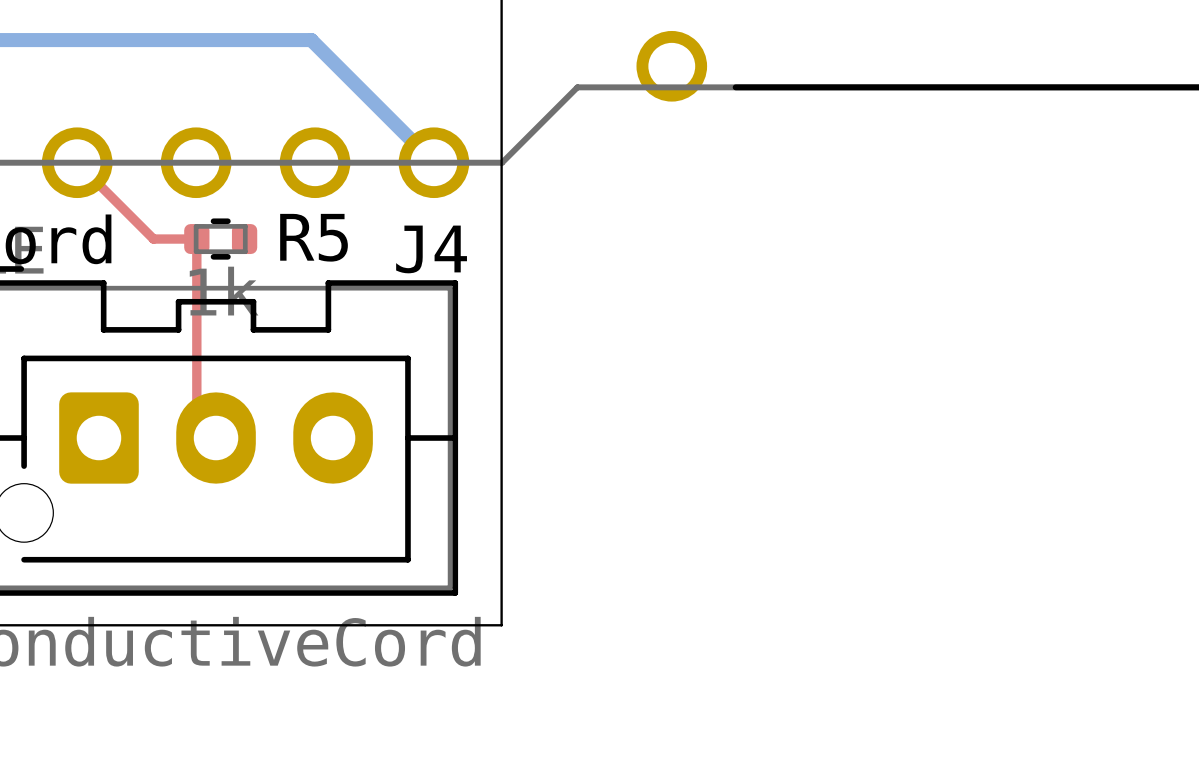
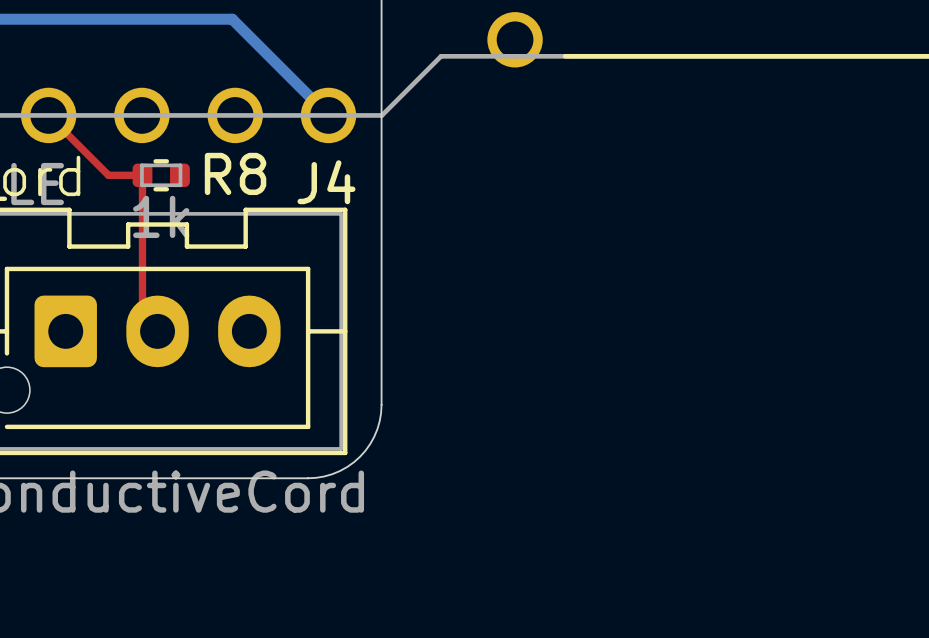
R5 name: R5 (314, 237) -> R8 (235, 173)
board edge: (501, 531) (501, 625) (407, 625) -> (381, 404) (379, 421) (374, 436) (360, 456) (339, 471) (324, 476) (308, 478)

